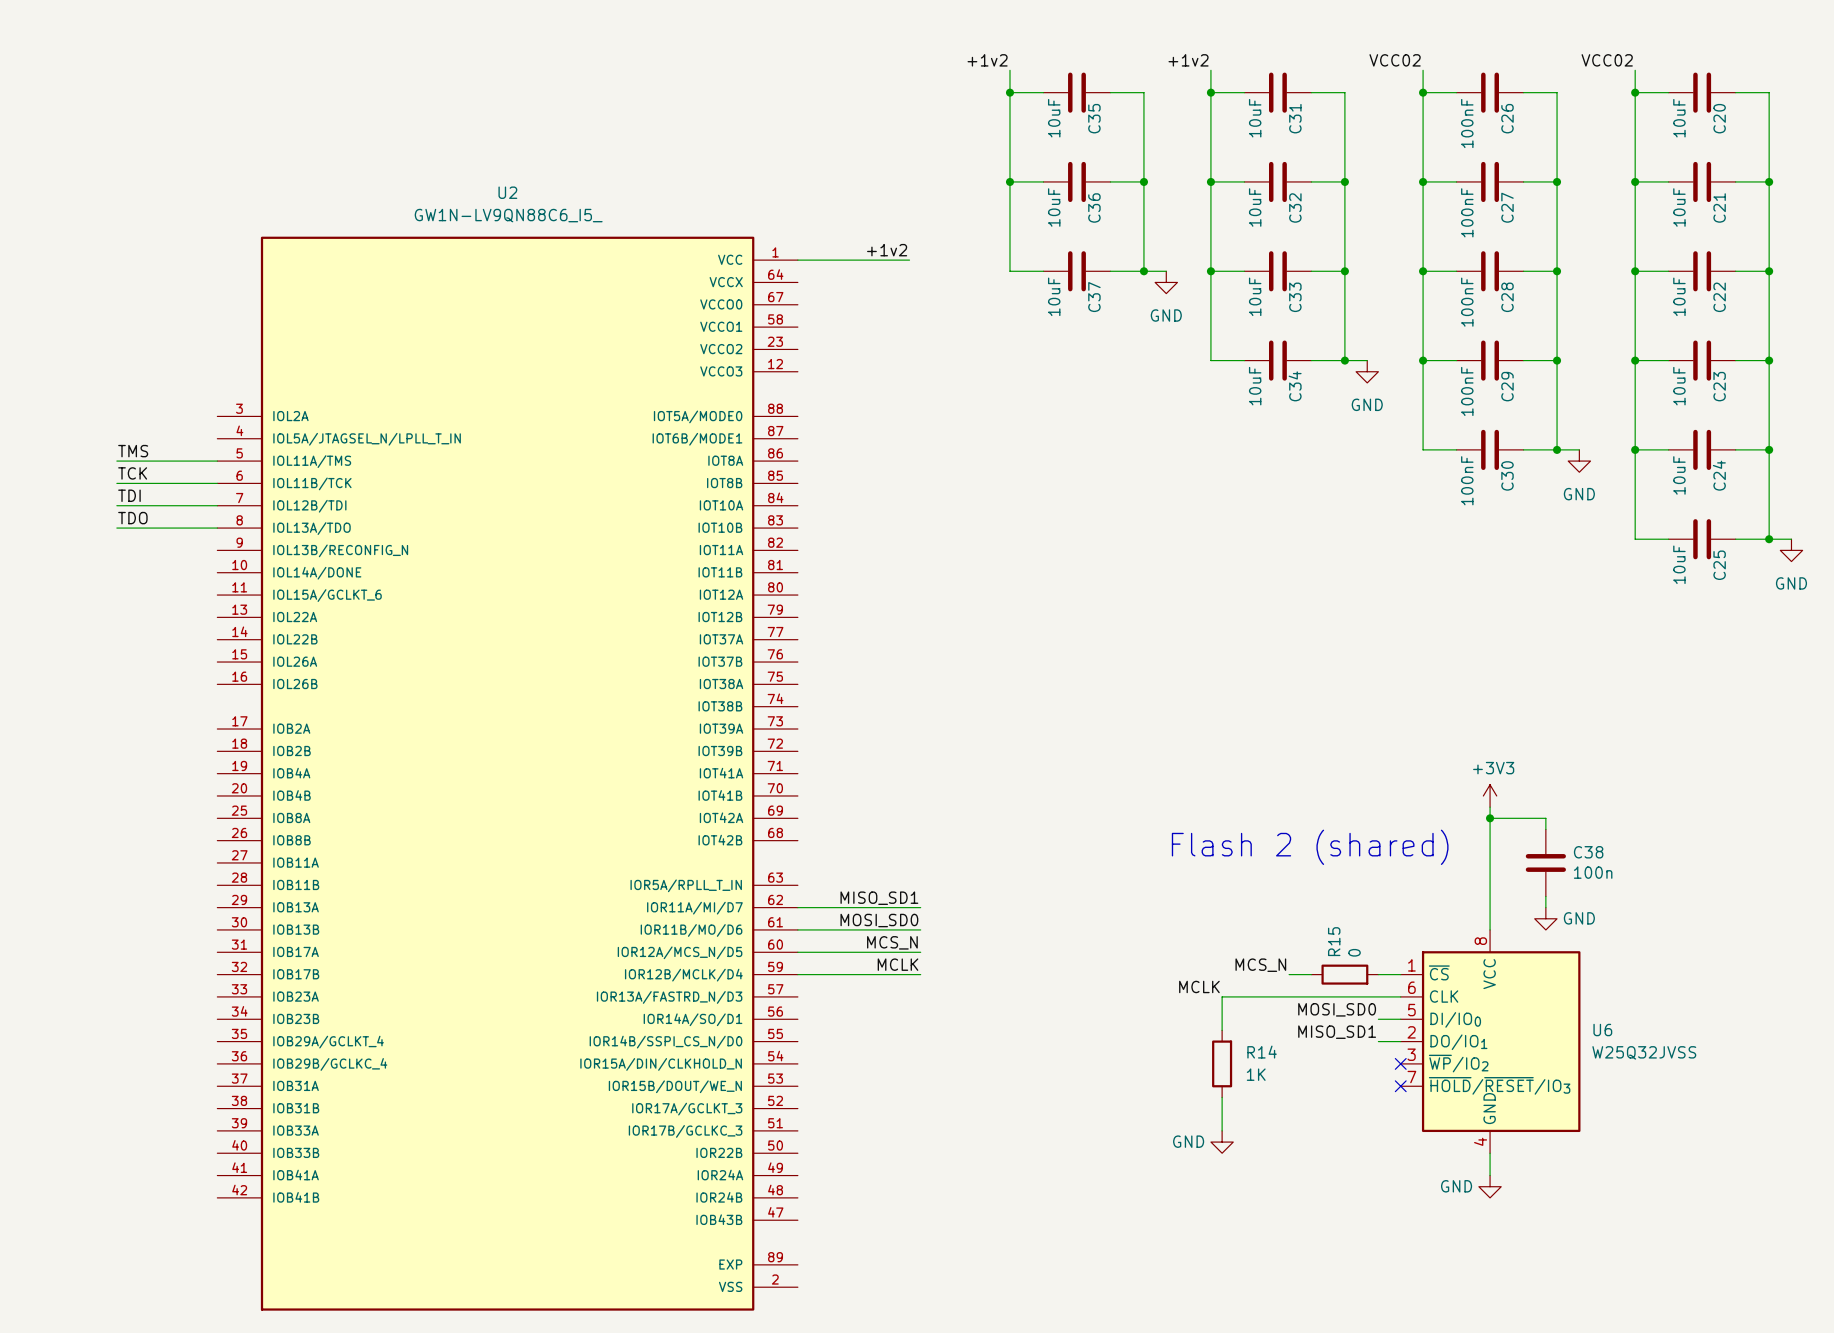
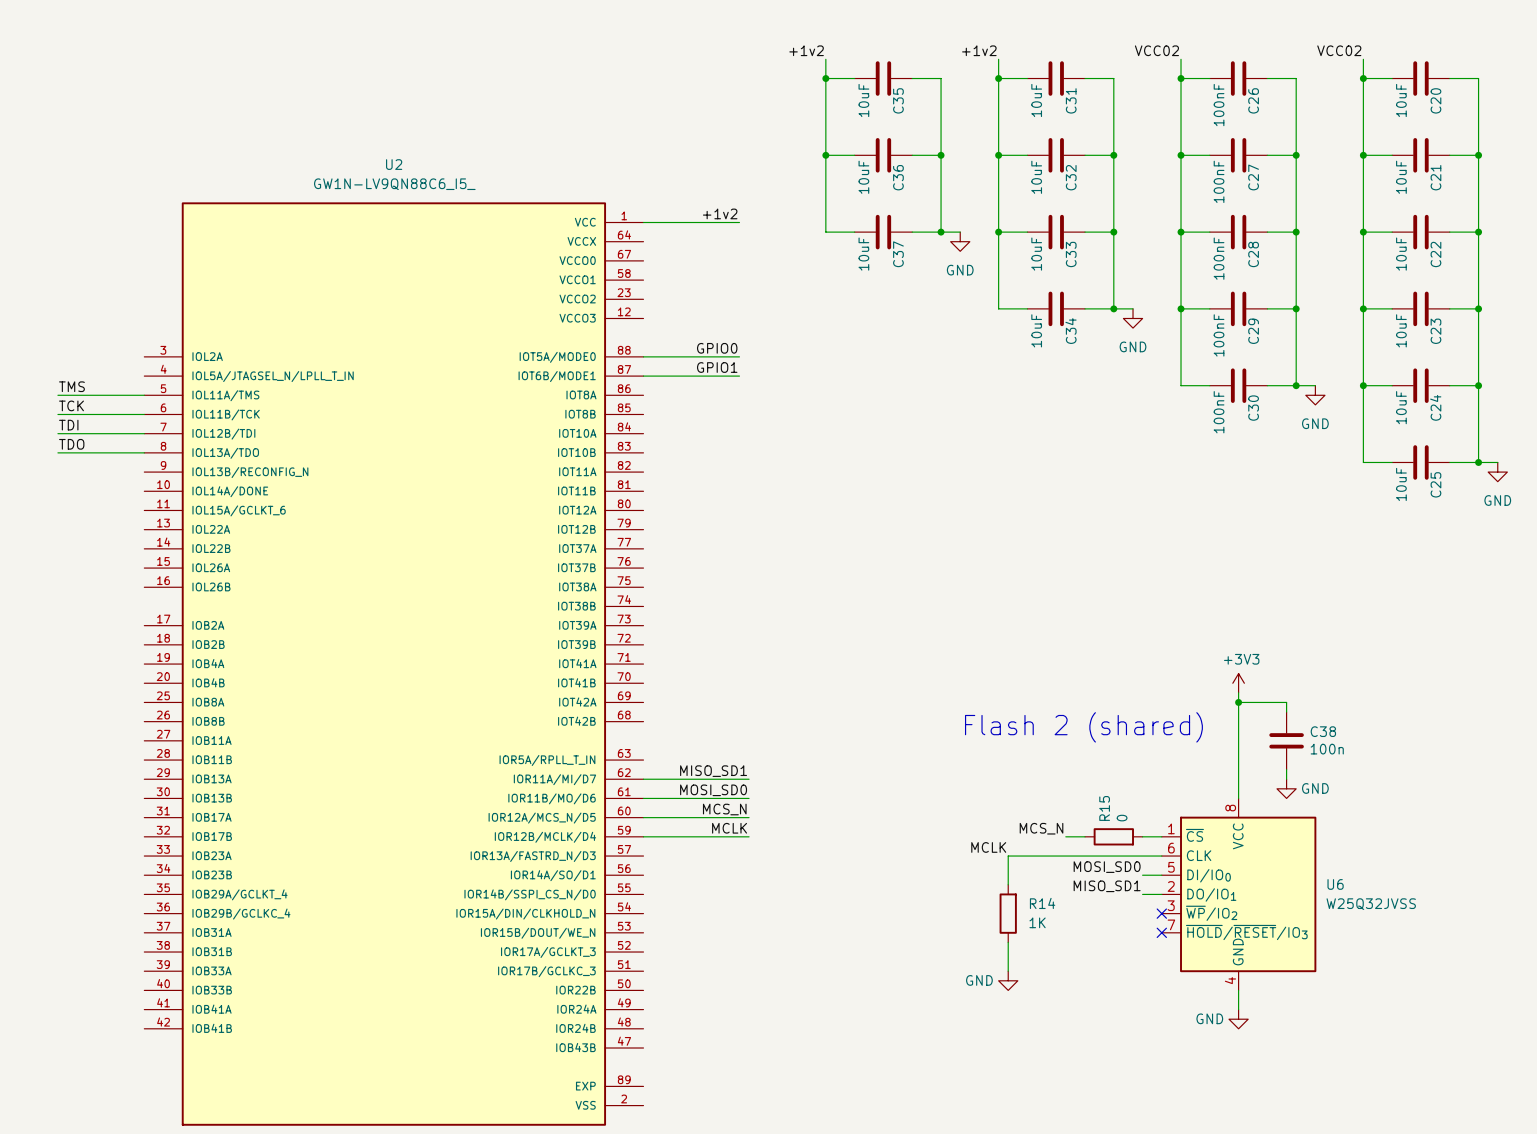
label: none -> GPIO0 (717, 348)
wire: none -> (643, 356) (739, 356)
label: none -> GPIO1 (717, 367)
wire: none -> (643, 376) (739, 376)

